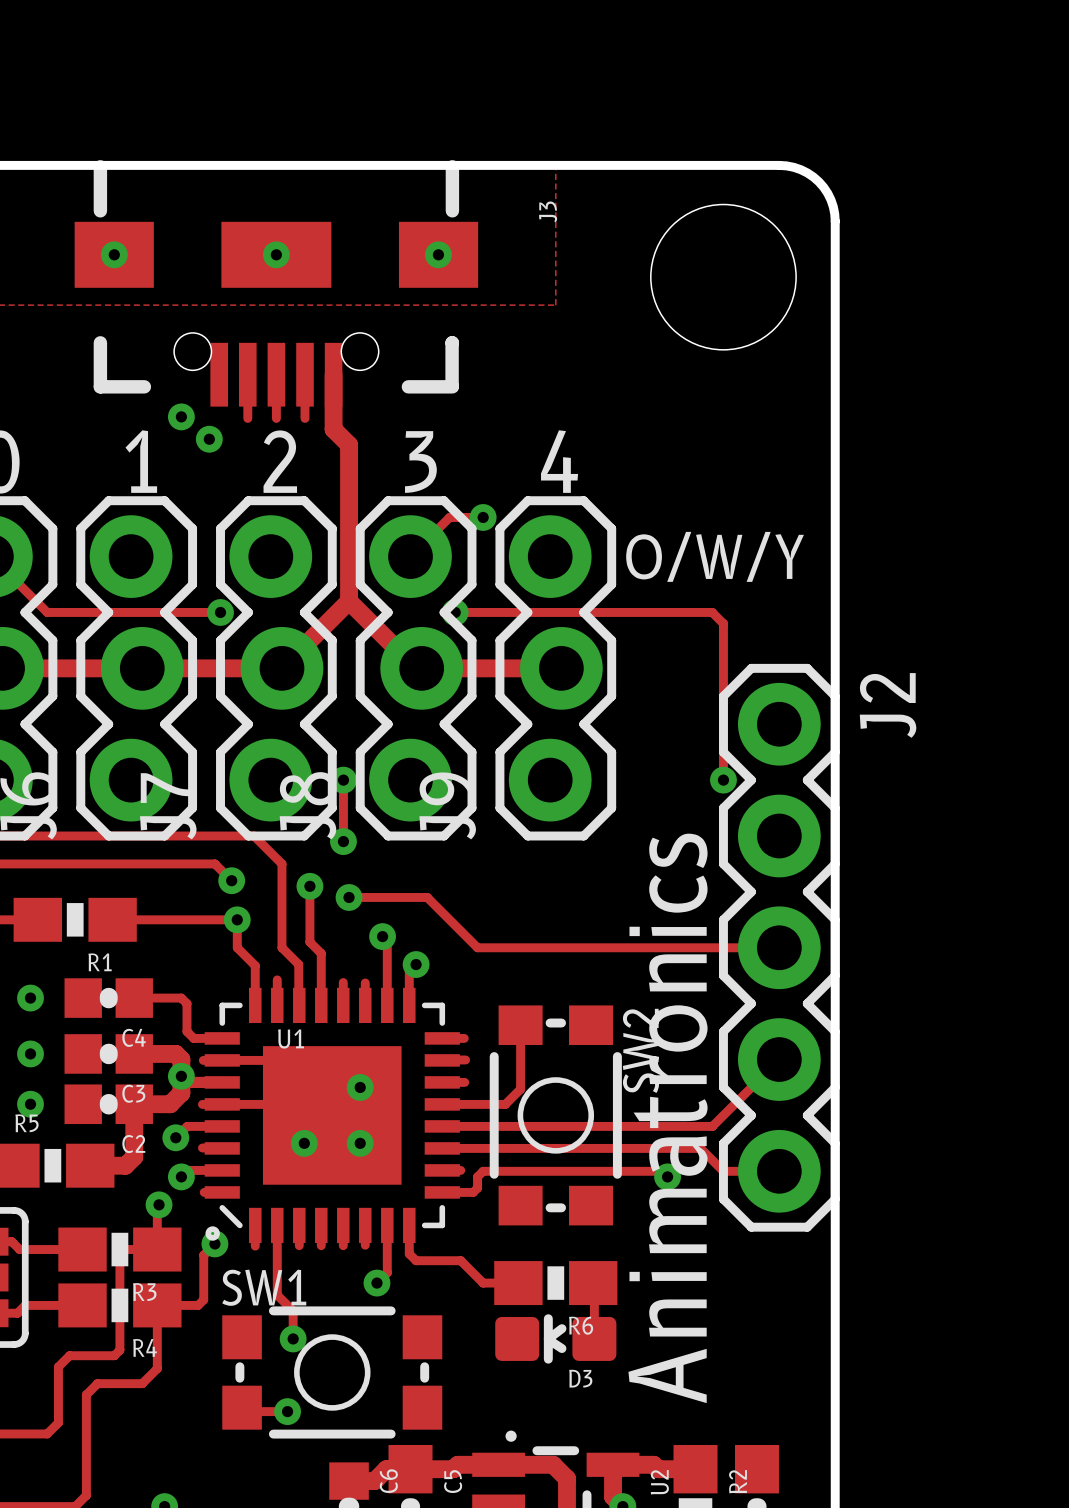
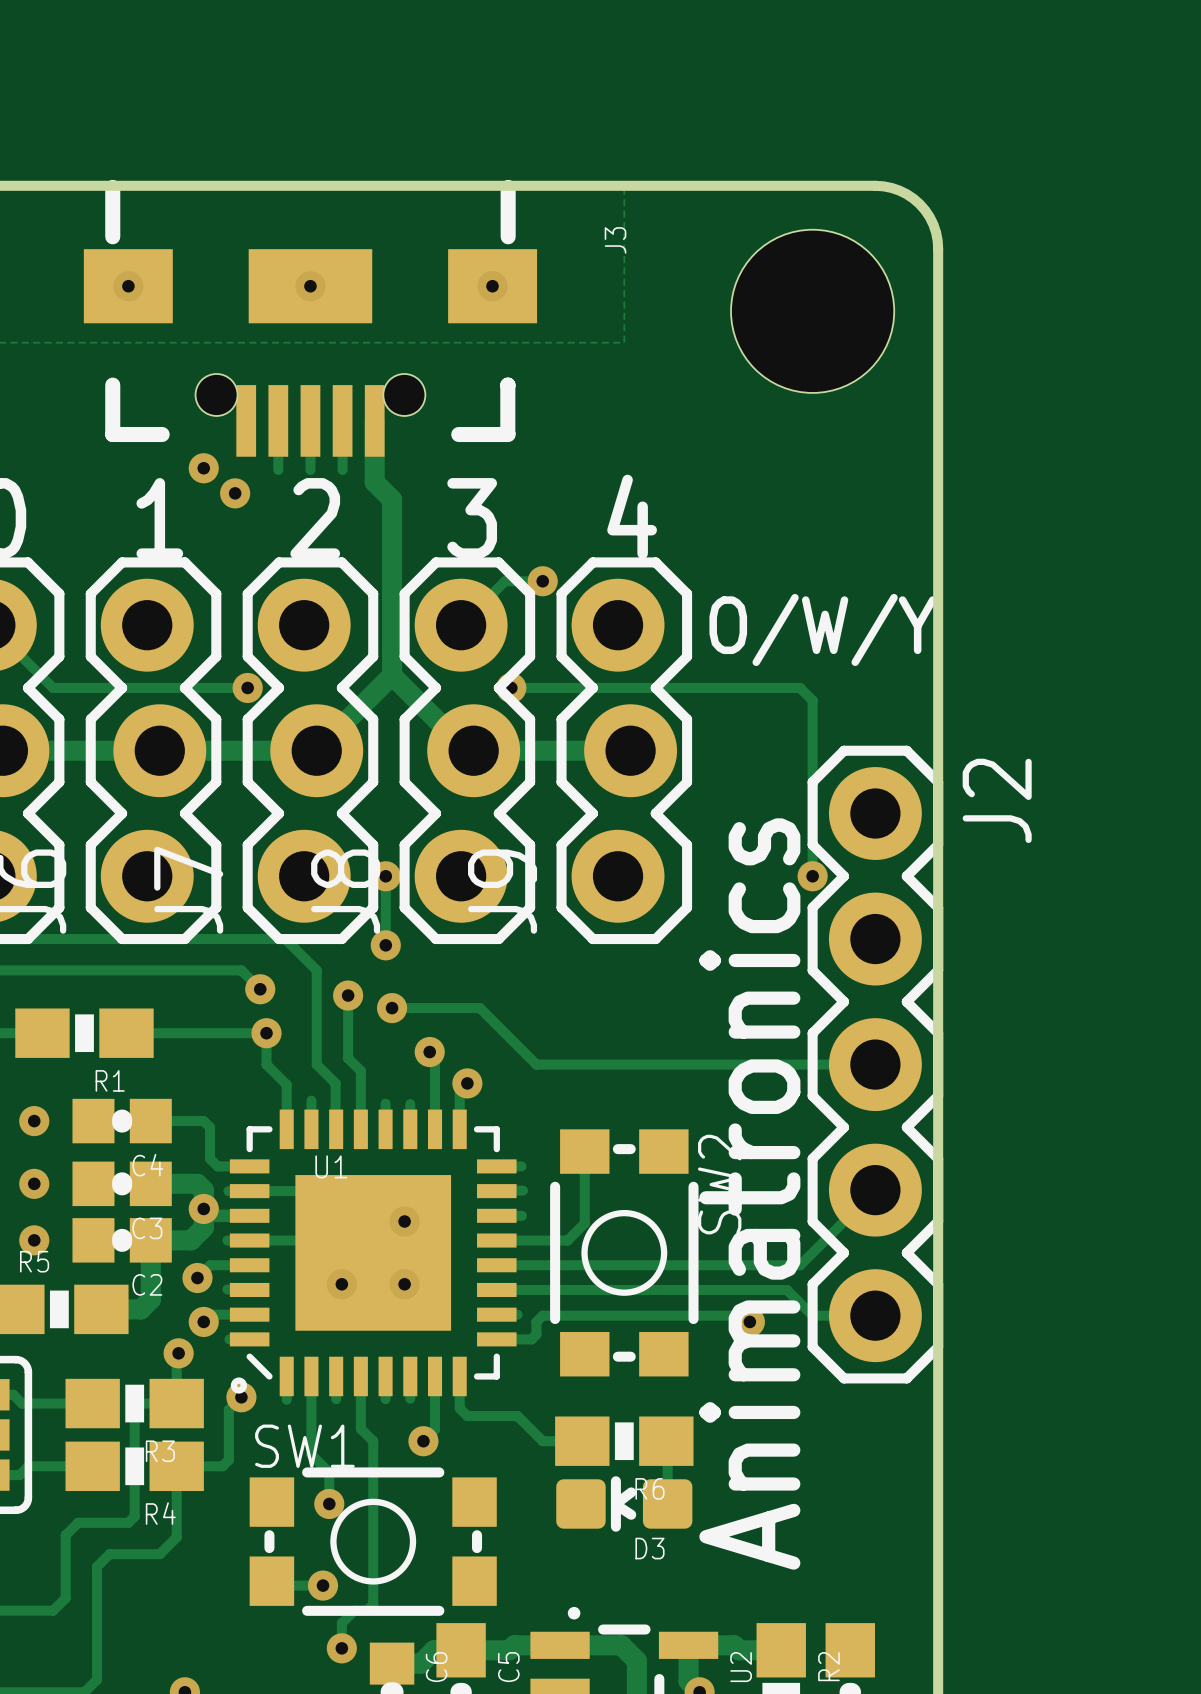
track: none -> (360, 1399) (360, 1428) (373, 1441) (373, 1604) (366, 1610) (354, 1610) (341, 1623) (341, 1648)
via: none -> (341, 1648)

